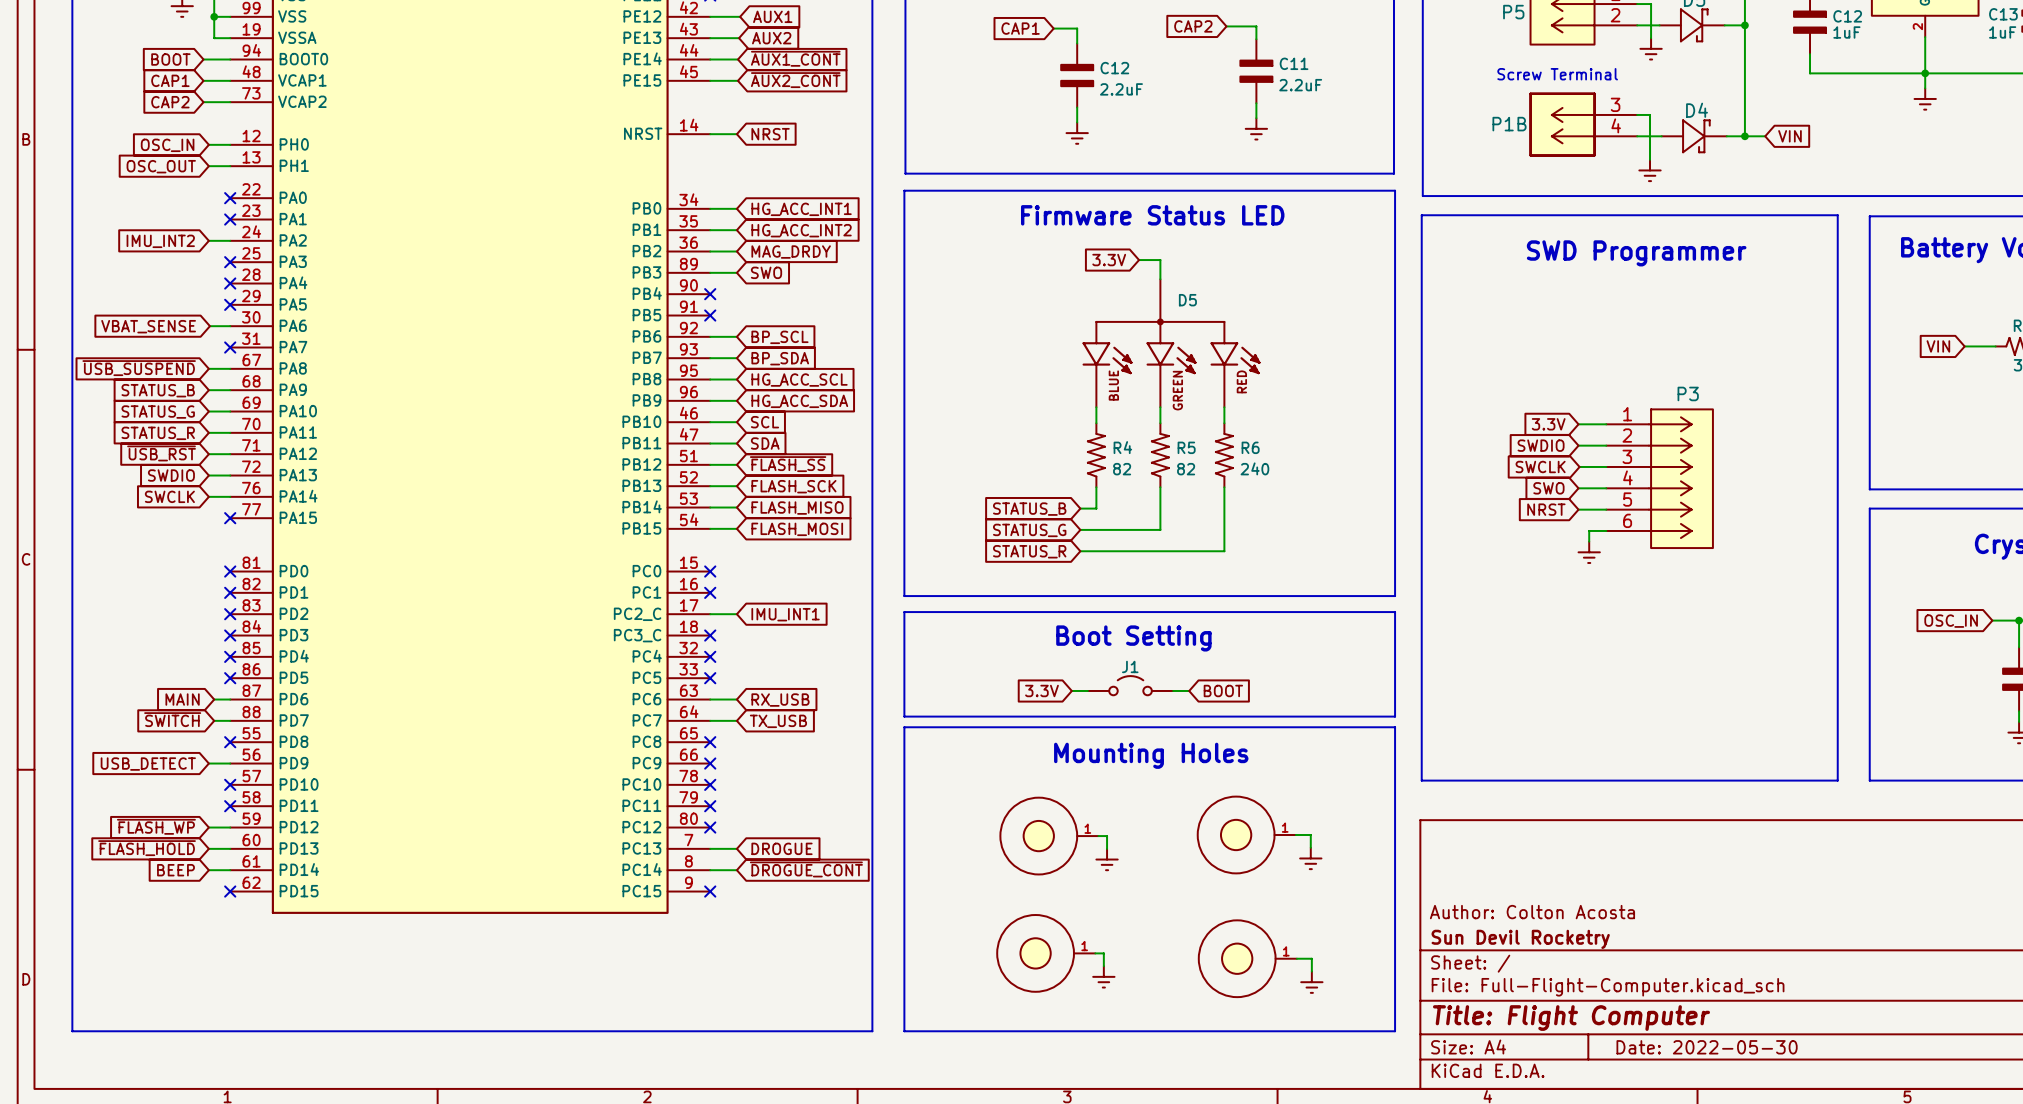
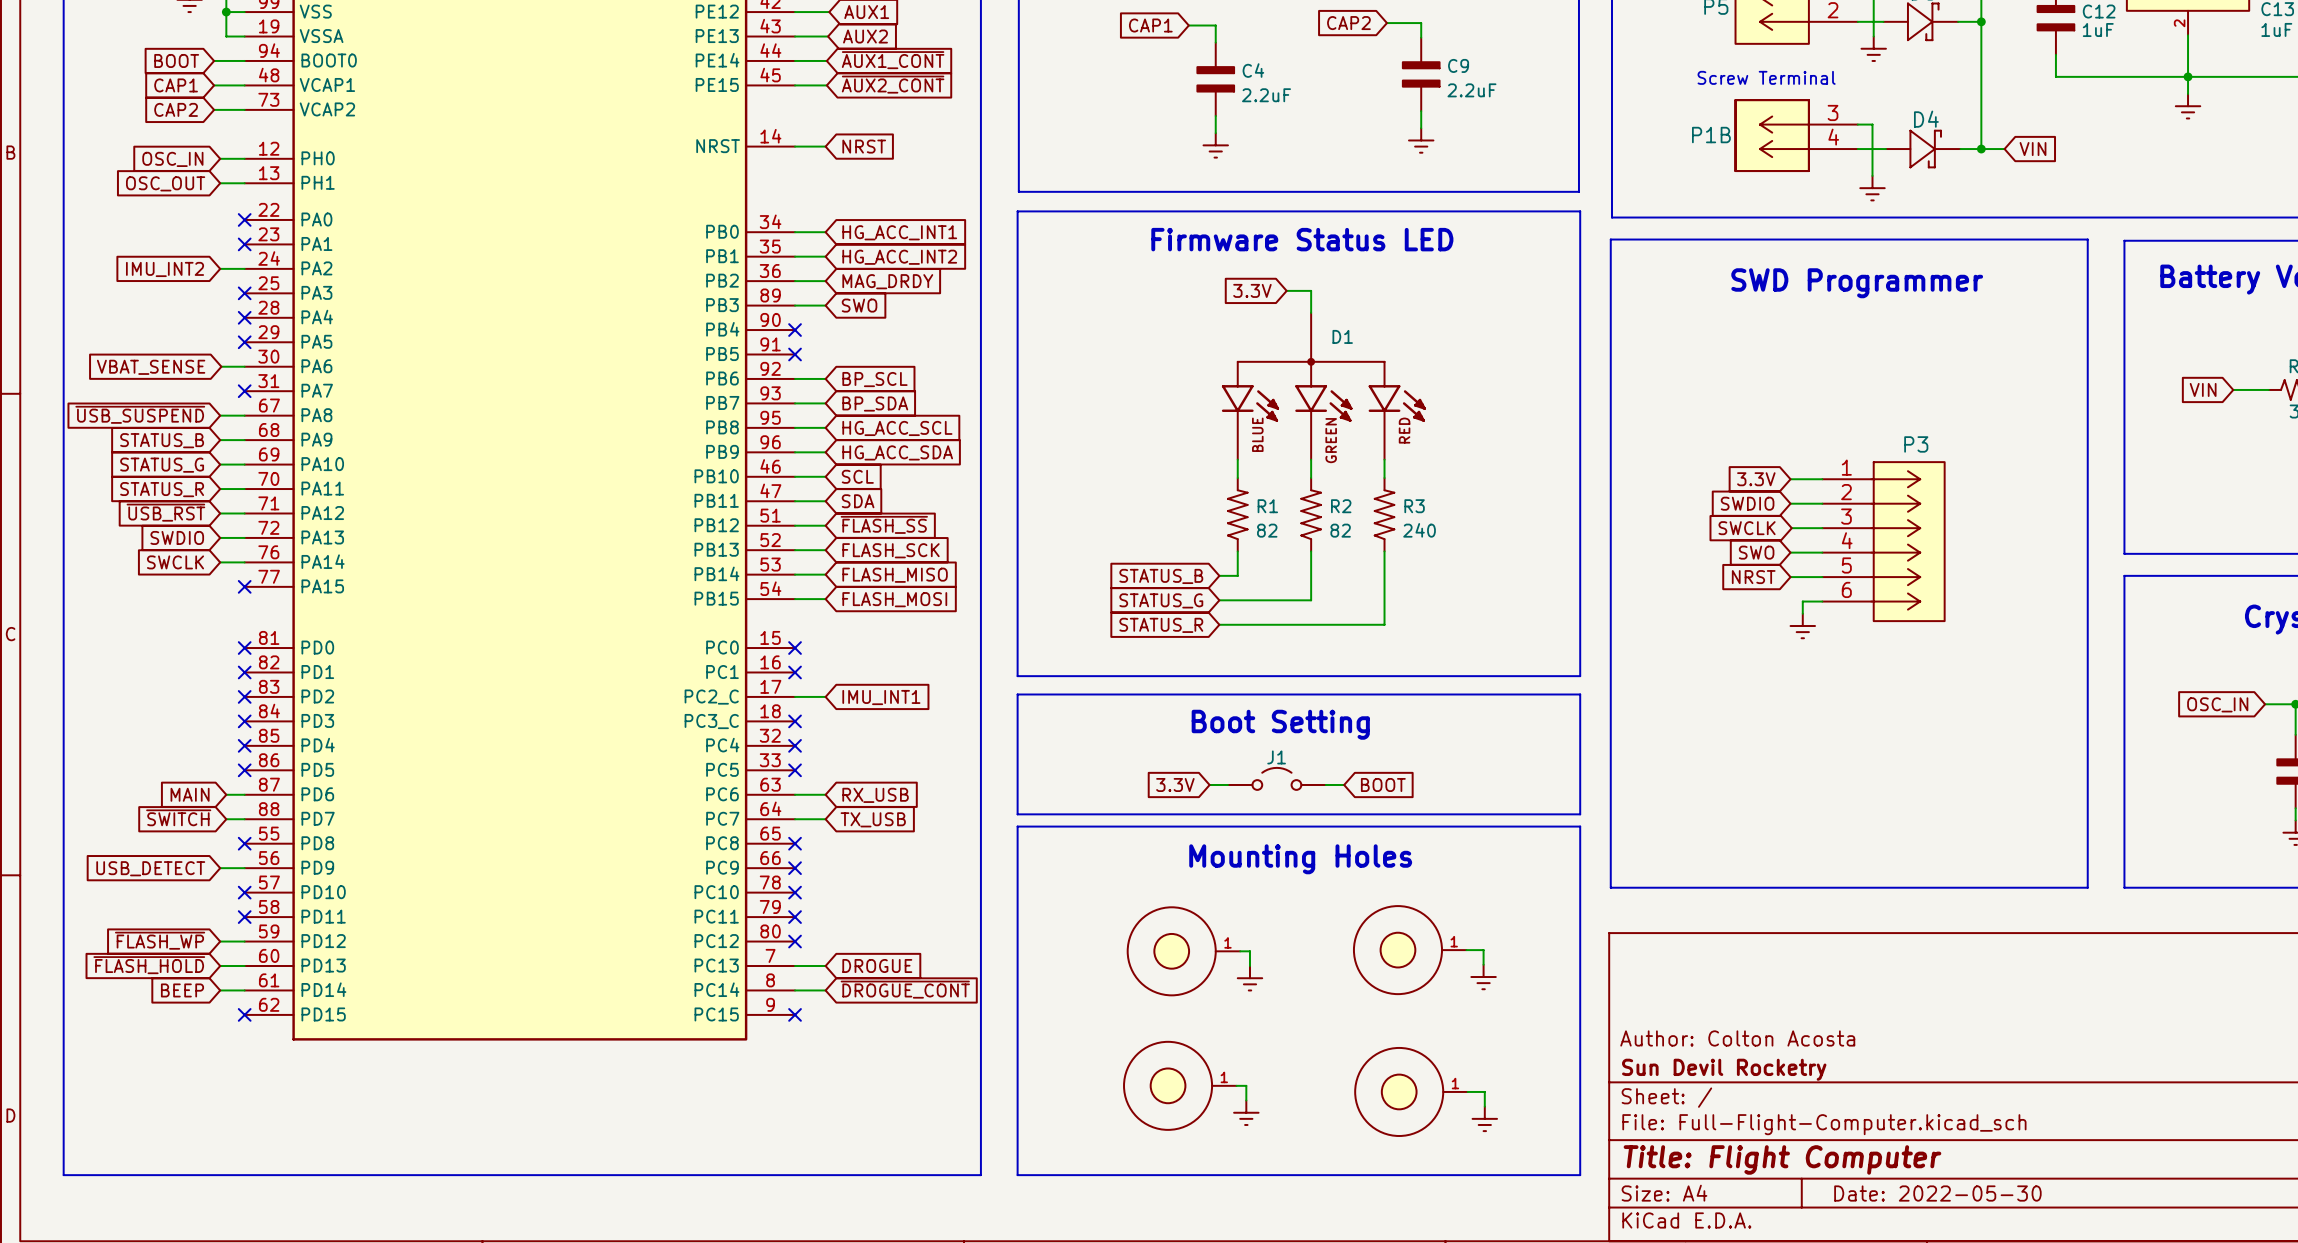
C11 name: C11 (1294, 63) -> C9 (1458, 65)
C12 name: C12 (1114, 68) -> C4 (1253, 70)
D5 name: D5 (1187, 300) -> D1 (1342, 336)
R4 name: R4 (1122, 447) -> R1 (1267, 506)
R5 name: R5 (1186, 447) -> R2 (1341, 506)
R6 name: R6 (1250, 447) -> R3 (1414, 506)

